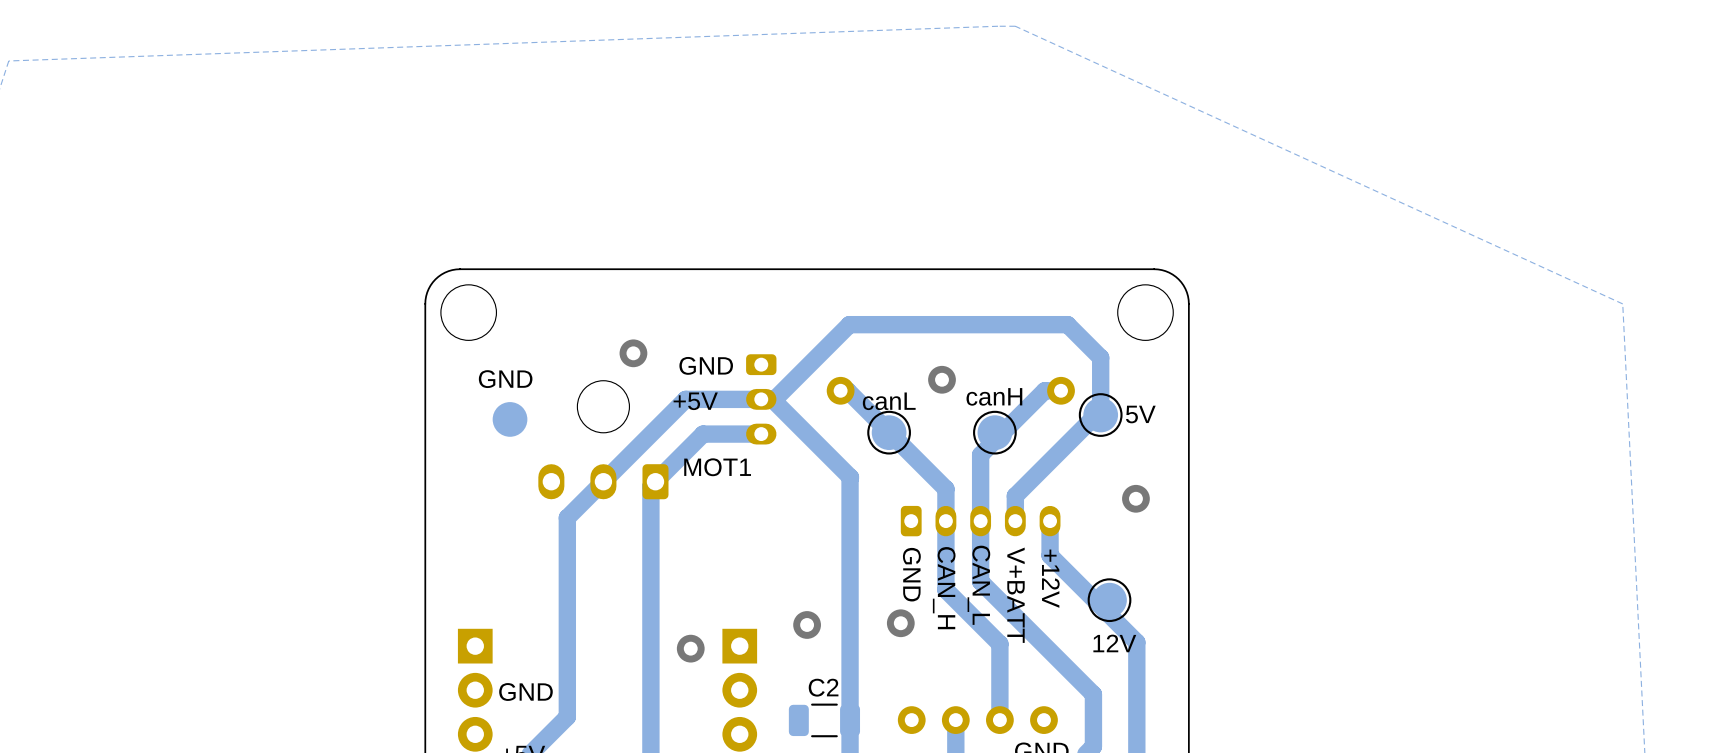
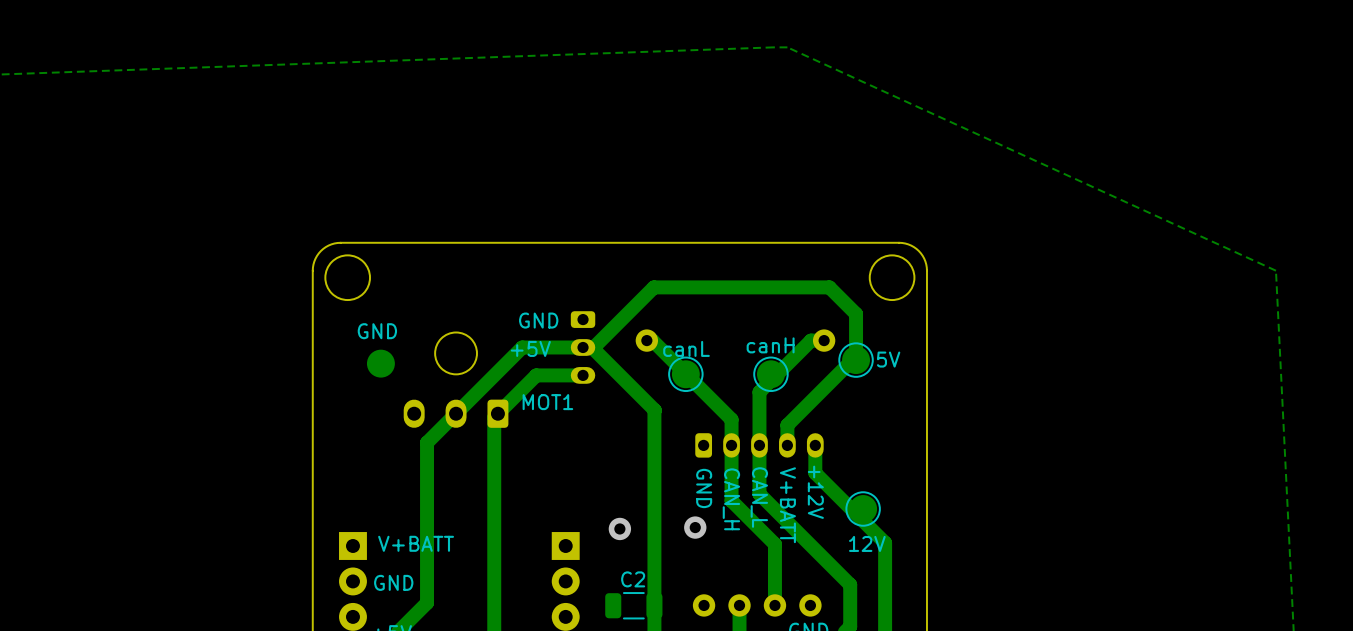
via: (633, 353) -> none
via: (942, 379) -> none
via: (1135, 498) -> none
text: none -> V+BATT (416, 543)
via: (690, 648) -> none

